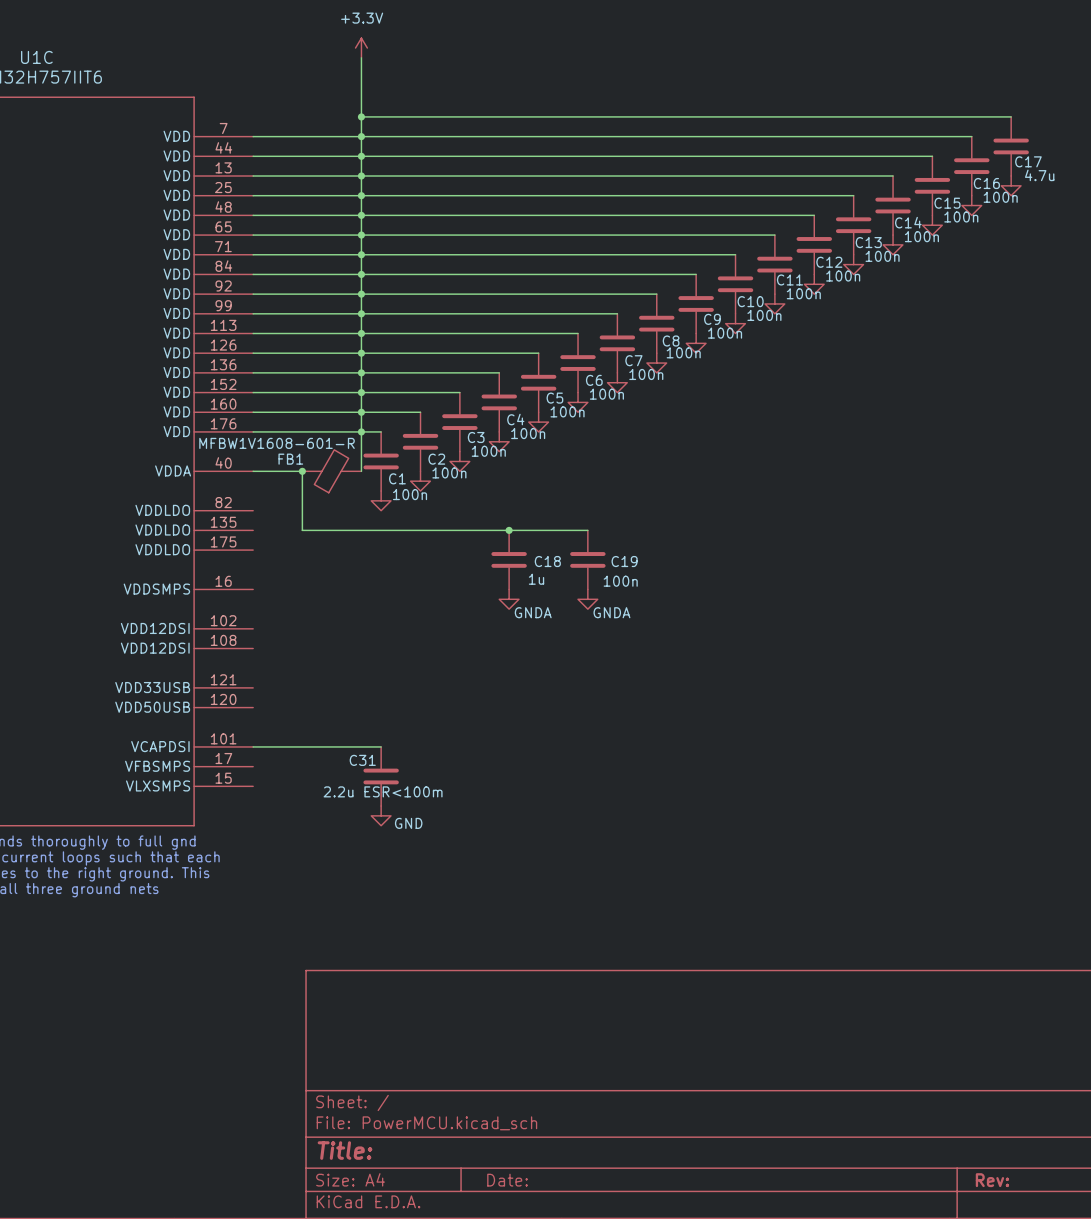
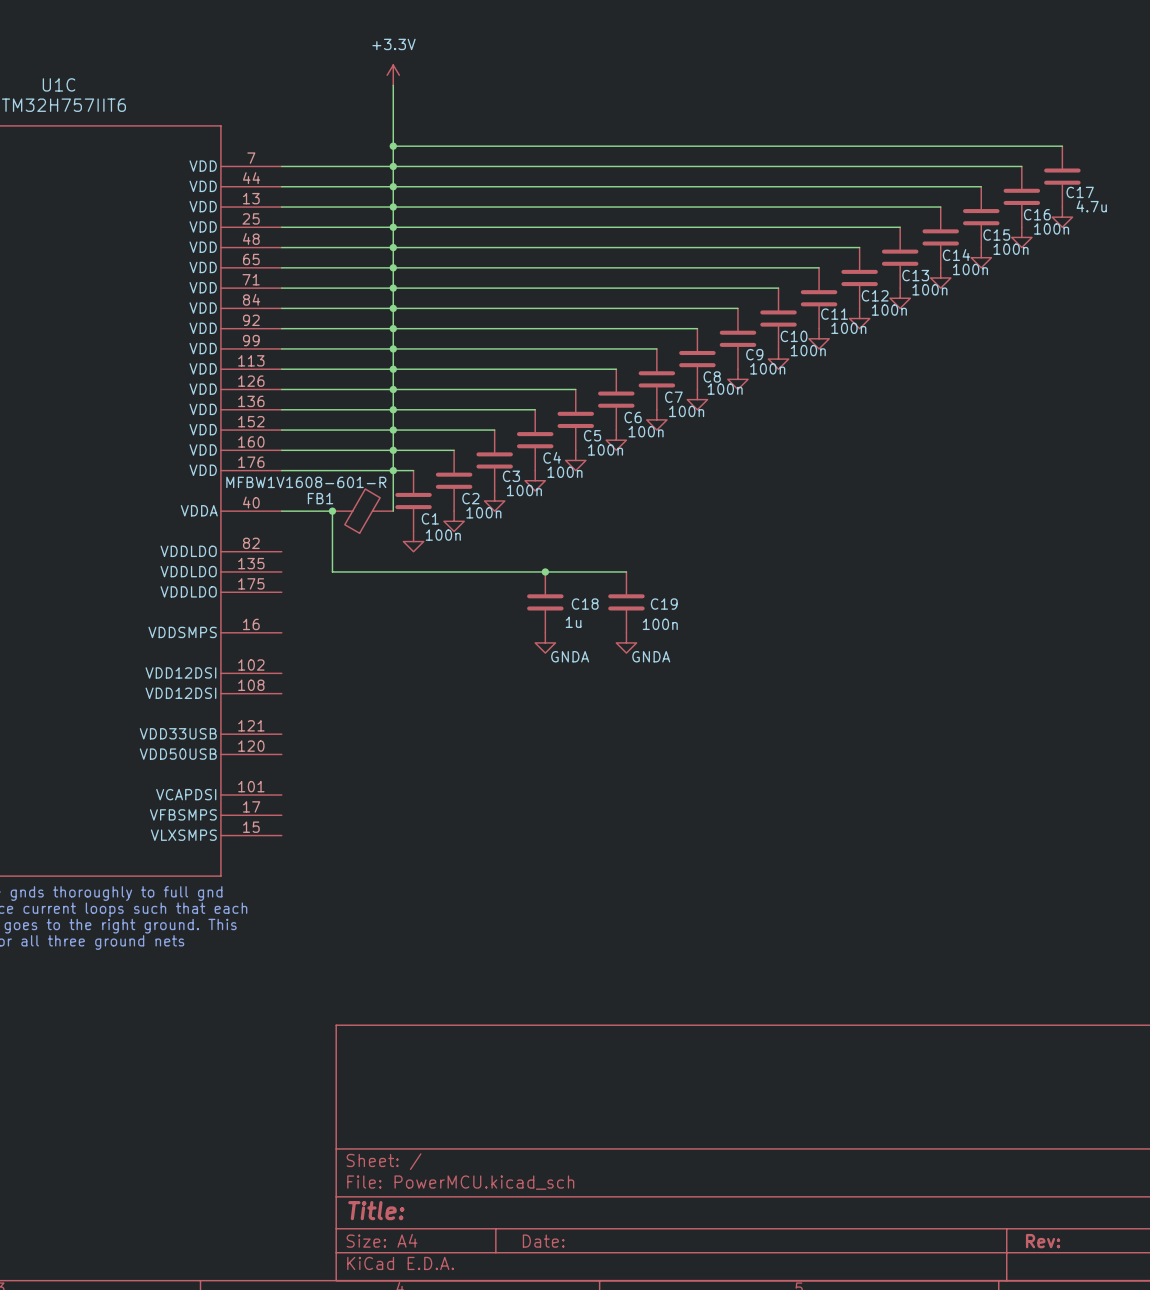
wire: (253, 746) (381, 746) -> none
C31: 2.2u ESR<100m (381, 776) -> none
power symbol: GND (381, 815) -> none

